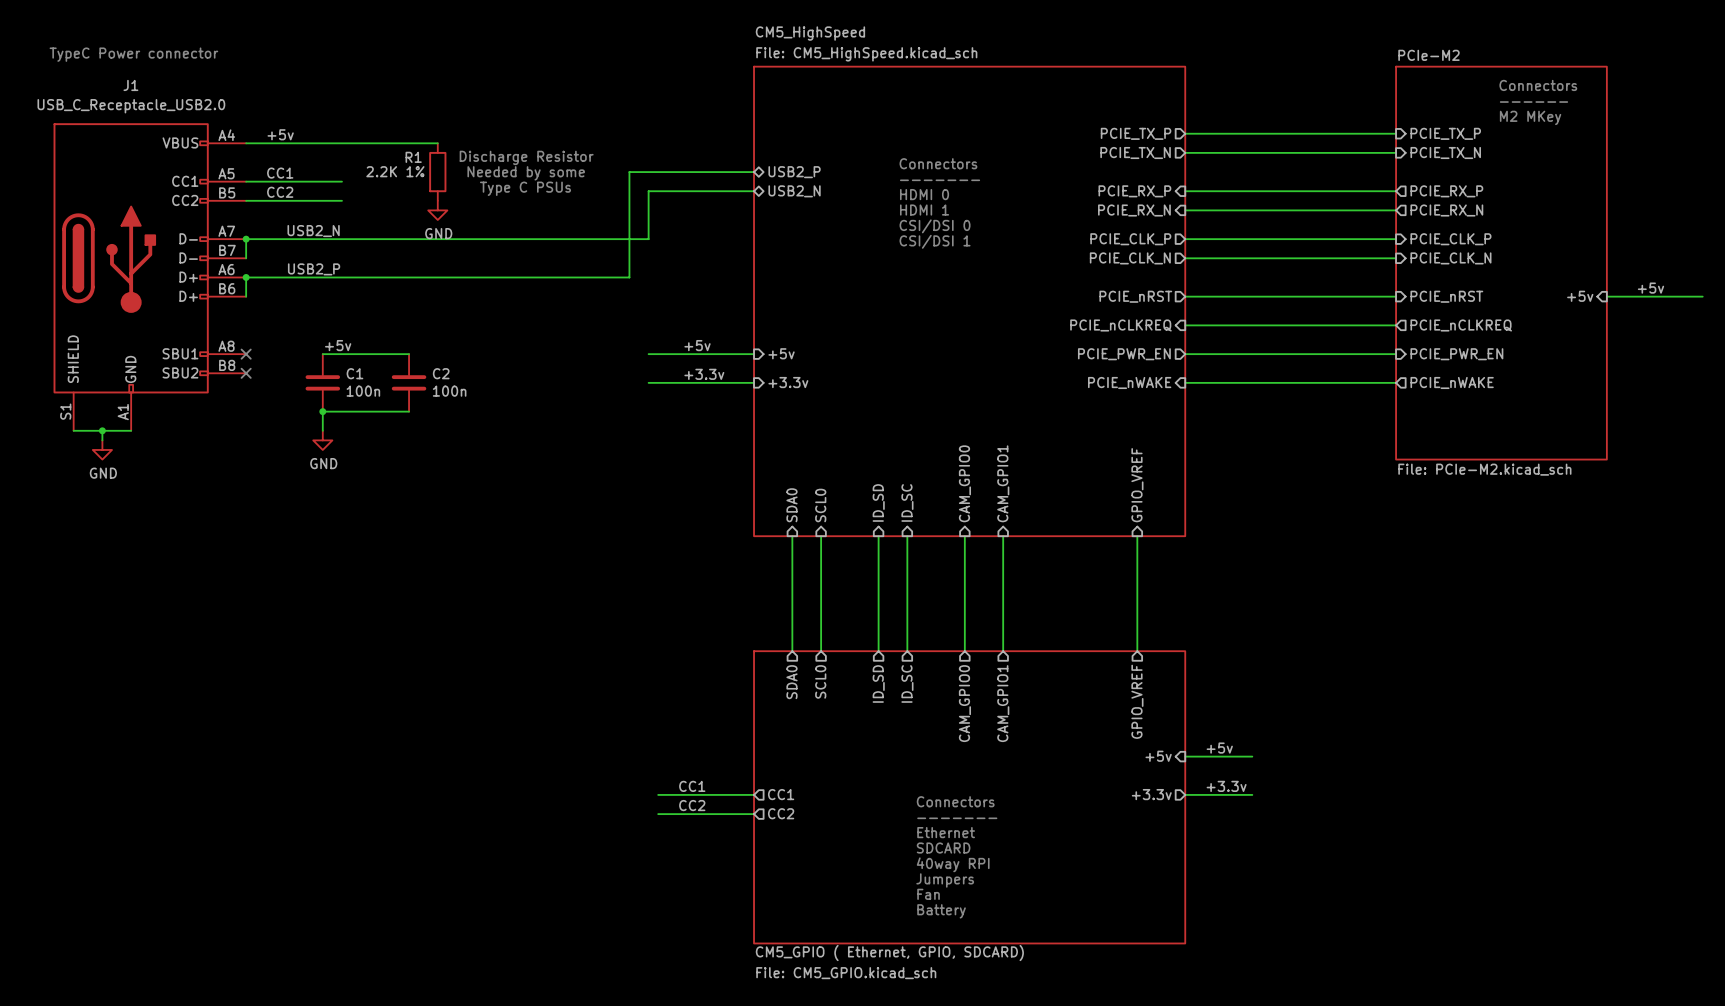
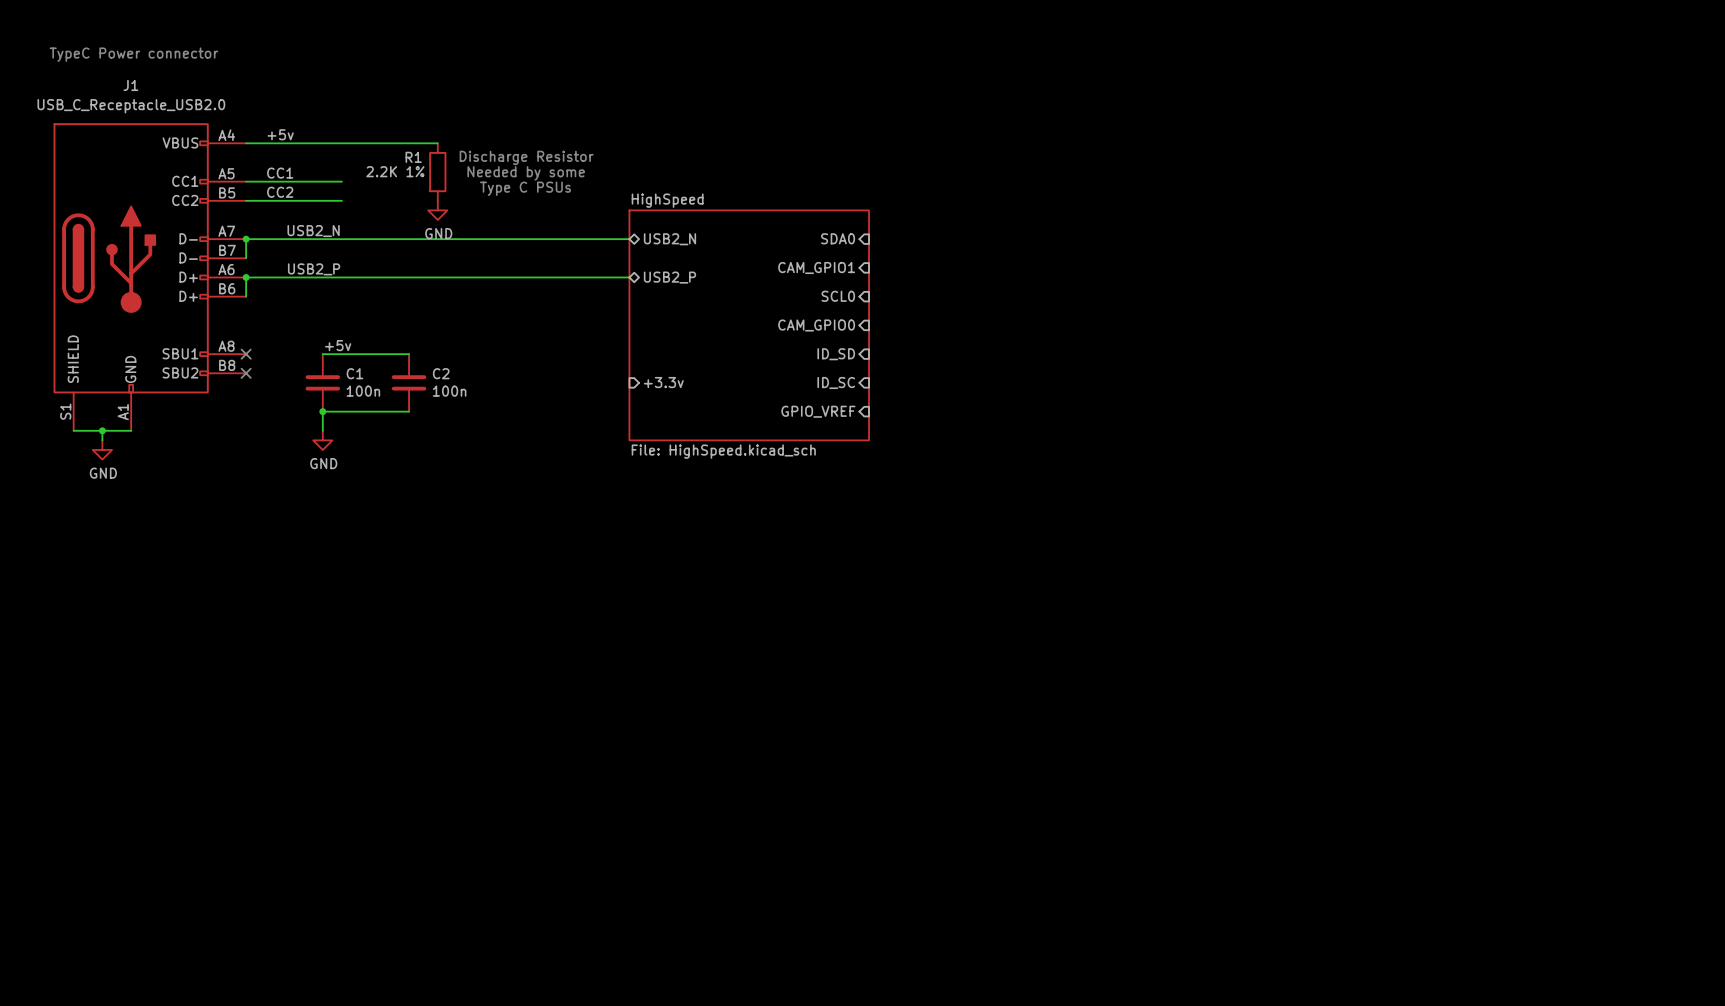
text: Connectors (1538, 85) -> none
text: ------ (1533, 102) -> none
text: M2 MKey (1530, 117) -> none
sheet pin: PCIE_TX_P (1136, 133) -> none
wire: (1185, 133) (1396, 133) -> none
sheet pin: PCIE_TX_P (1445, 133) -> none
wire: (1185, 152) (1396, 152) -> none
sheet pin: PCIE_TX_N (1135, 153) -> none
sheet pin: PCIE_TX_N (1445, 153) -> none
text: Connectors (938, 163) -> none
wire: (754, 172) (629, 172) (629, 277) -> none
sheet pin position: USB2_P (794, 172) -> USB2_P (669, 277)
text: ------- (940, 180) -> none
wire: (754, 191) (648, 191) (648, 239) (629, 239) -> none
sheet pin position: USB2_N (794, 191) -> USB2_N (669, 239)
sheet pin: PCIE_RX_P (1134, 191) -> none
wire: (1185, 191) (1396, 191) -> none
sheet pin: PCIE_RX_P (1446, 191) -> none
text: HDMI 0 (924, 194) -> none
text: HDMI 1 (924, 210) -> none
sheet pin: PCIE_RX_N (1134, 210) -> none
wire: (1185, 210) (1396, 210) -> none
sheet pin: PCIE_RX_N (1446, 210) -> none
text: CSI/DSI 0 (935, 226) -> none
sheet pin: none -> SDA0 (838, 238)
sheet pin: PCIE_CLK_P (1130, 239) -> none
wire: (1185, 239) (1396, 239) -> none
sheet pin: PCIE_CLK_P (1450, 239) -> none
text: CSI/DSI 1 (935, 241) -> none
sheet pin: PCIE_CLK_N (1130, 258) -> none
wire: (1185, 258) (1396, 258) -> none
sheet pin: PCIE_CLK_N (1450, 258) -> none
sheet PCIe-M2: File: PCIe-M2.kicad_sch (1501, 263) -> none
sheet pin: none -> CAM_GPIO1 (816, 267)
label: +5v (1650, 288) -> none
sheet pin: none -> SCL0 (838, 296)
sheet pin: PCIE_nRST (1135, 296) -> none
wire: (1185, 296) (1396, 296) -> none
sheet pin: PCIE_nRST (1446, 296) -> none
sheet pin: +5v (1580, 296) -> none
wire: (1606, 296) (1702, 296) -> none
sheet CM5_HighSpeed: File: CM5_HighSpeed.kicad_sch (969, 301) -> none
sheet HighSpeed: none -> File: HighSpeed.kicad_sch (749, 325)
sheet pin: none -> CAM_GPIO0 (816, 325)
sheet pin: PCIE_nCLKREQ (1120, 325) -> none
wire: (1185, 325) (1396, 325) -> none
sheet pin: PCIE_nCLKREQ (1461, 325) -> none
label: +5v (697, 345) -> none
sheet pin: +5v (781, 353) -> none
wire: (648, 354) (754, 354) -> none
sheet pin: none -> ID_SD (836, 354)
sheet pin: PCIE_PWR_EN (1124, 354) -> none
wire: (1185, 354) (1396, 354) -> none
sheet pin: PCIE_PWR_EN (1456, 354) -> none
label: +3.3v (704, 374) -> none
wire: (648, 382) (754, 382) -> none
sheet pin position: +3.3v (788, 382) -> +3.3v (663, 382)
sheet pin: none -> ID_SC (836, 382)
sheet pin: PCIE_nWAKE (1129, 382) -> none
wire: (1185, 382) (1396, 382) -> none
sheet pin: PCIE_nWAKE (1452, 382) -> none
sheet pin: none -> GPIO_VREF (818, 411)
sheet pin: CAM_GPIO0 (964, 483) -> none
sheet pin: CAM_GPIO1 (1003, 483) -> none
sheet pin: GPIO_VREF (1137, 485) -> none
sheet pin: ID_SD (878, 502) -> none
sheet pin: ID_SC (907, 502) -> none
sheet pin: SDA0 (791, 505) -> none
sheet pin: SCL0 (820, 505) -> none
wire: (792, 536) (792, 651) -> none
wire: (821, 536) (821, 651) -> none
wire: (878, 536) (878, 651) -> none
wire: (907, 536) (907, 651) -> none
wire: (964, 536) (964, 651) -> none
wire: (1003, 536) (1003, 651) -> none
wire: (1137, 536) (1137, 651) -> none
sheet pin: SCL0 (820, 681) -> none
sheet pin: SDA0 (791, 682) -> none
sheet pin: ID_SD (878, 683) -> none
sheet pin: ID_SC (907, 683) -> none
sheet pin: GPIO_VREF (1137, 701) -> none
sheet pin: CAM_GPIO0 (964, 703) -> none
sheet pin: CAM_GPIO1 (1003, 703) -> none
label: +5v (1219, 748) -> none
sheet pin: +5v (1158, 756) -> none
wire: (1185, 756) (1252, 756) -> none
label: CC1 (692, 786) -> none
label: +3.3v (1226, 786) -> none
wire: (658, 794) (754, 794) -> none
sheet pin: CC1 (781, 794) -> none
sheet pin: +3.3v (1151, 794) -> none
wire: (1185, 794) (1252, 794) -> none
sheet CM5_GPIO ( Ethernet, GPIO, SDCARD): File: CM5_GPIO.kicad_sch (969, 797) -> none
text: Connectors (955, 801) -> none
label: CC2 (692, 805) -> none
sheet pin: CC2 (781, 813) -> none
wire: (658, 814) (754, 814) -> none
text: ------- (957, 818) -> none
text: Ethernet (946, 832) -> none
text: SDCARD (943, 848) -> none
text: 40way RPI (953, 864) -> none
text: Jumpers (945, 880) -> none
text: Fan (928, 894) -> none
text: Battery (941, 911) -> none

